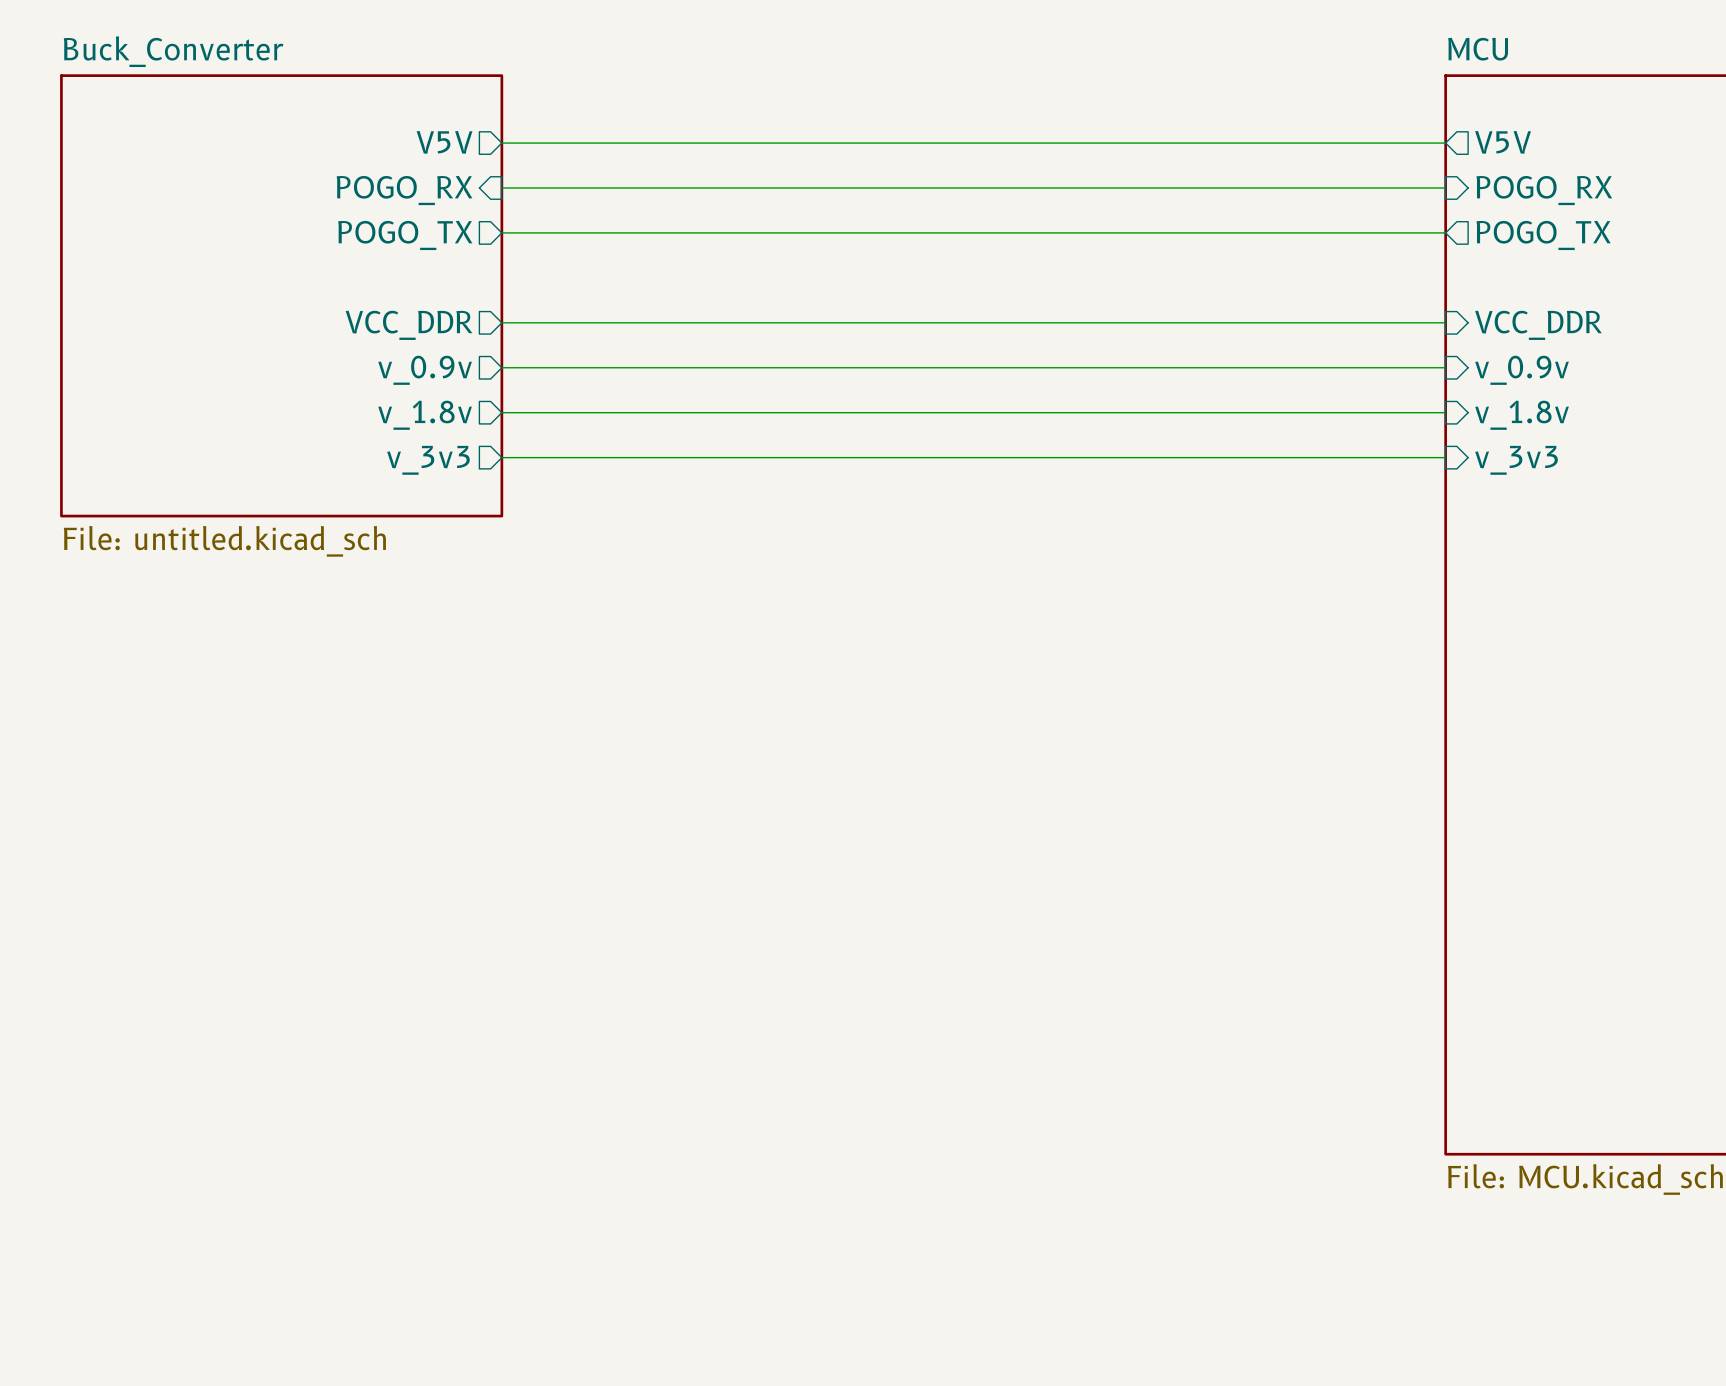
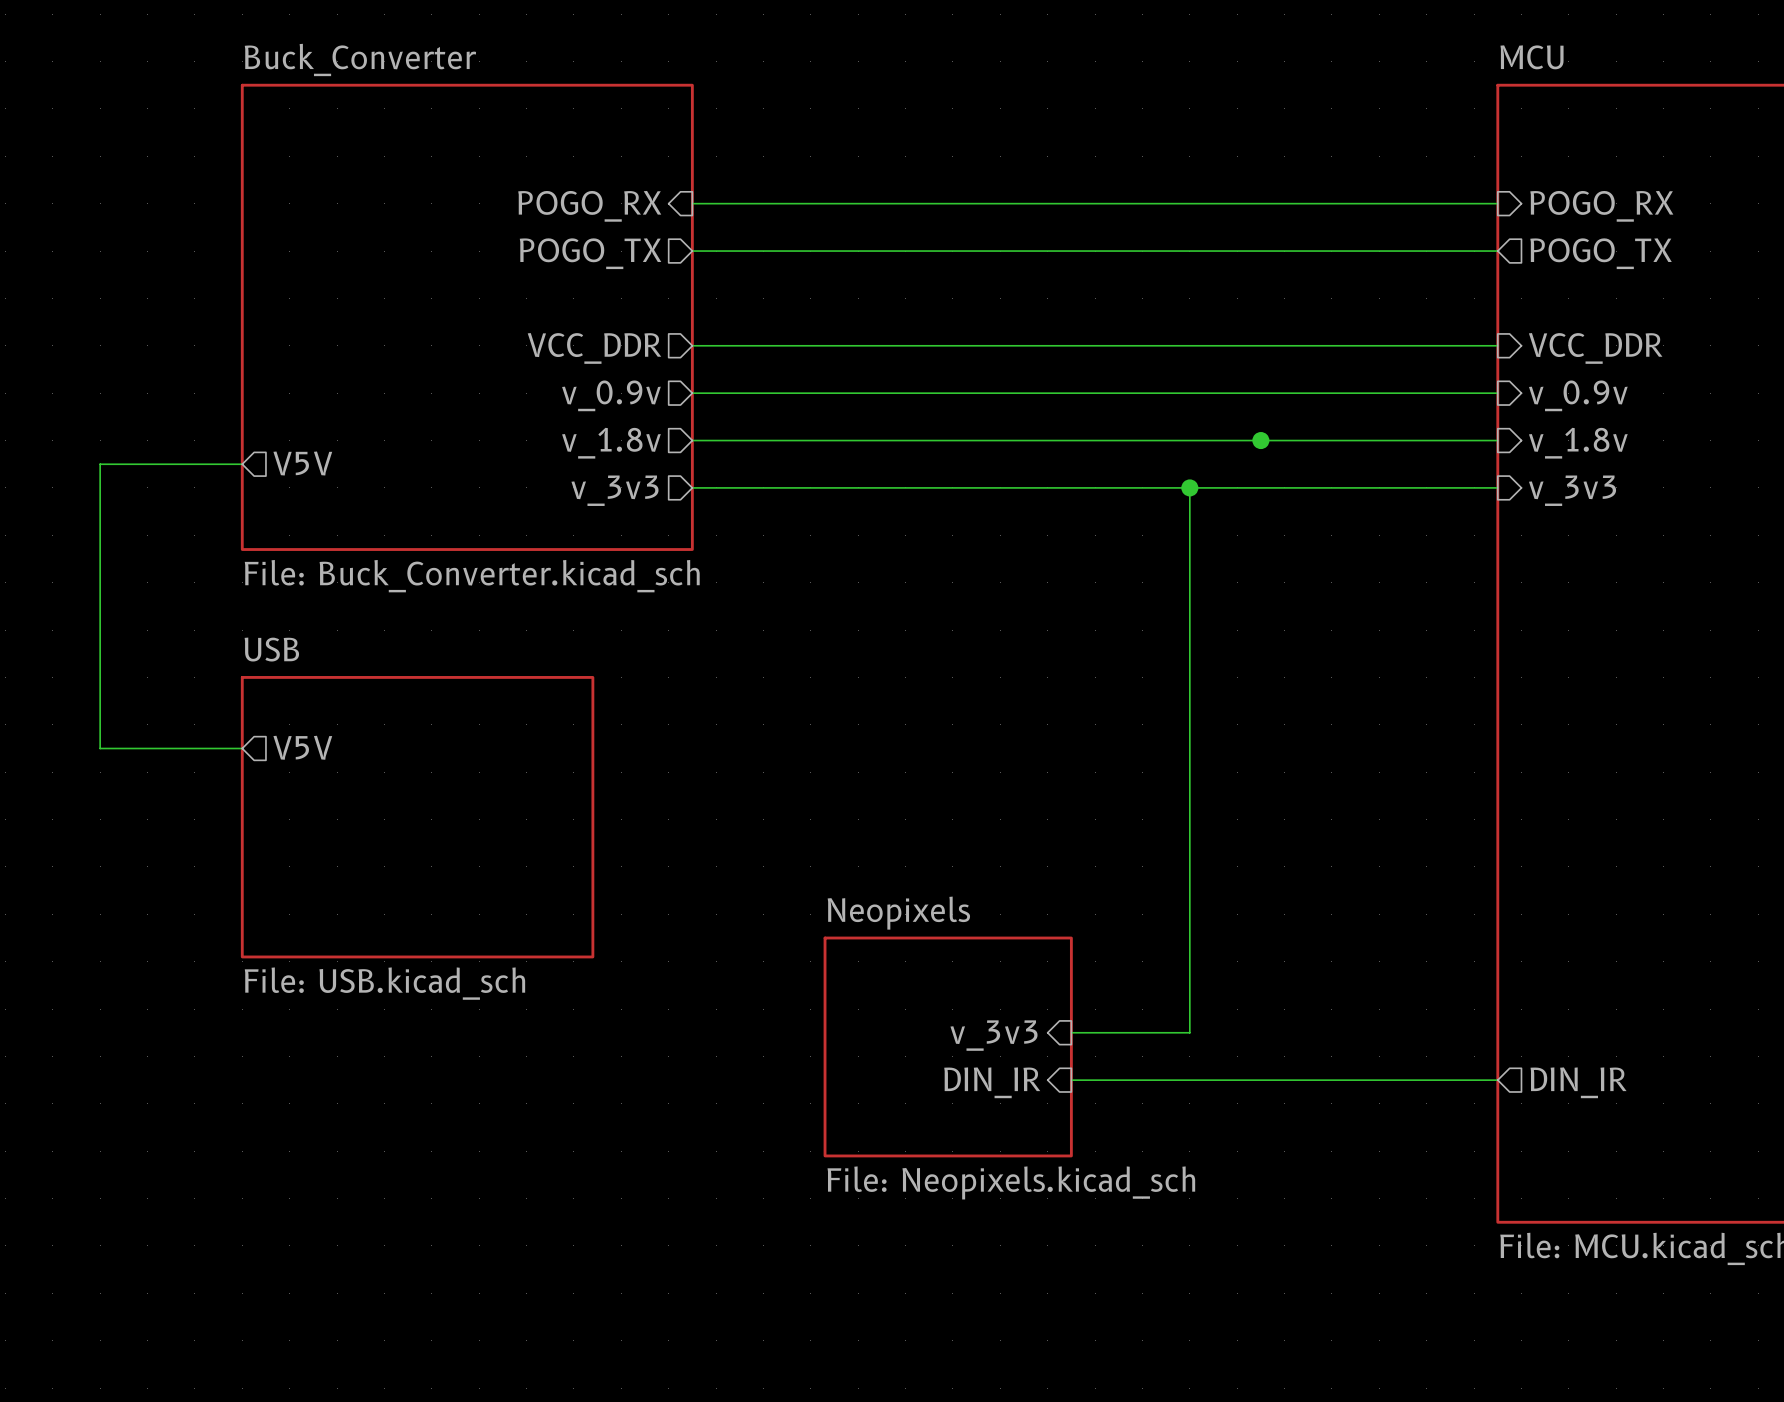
sheet pin: V5V (444, 142) -> none
sheet pin: V5V (1503, 142) -> none
wire: (501, 143) (1445, 143) -> none
wire: (501, 187) (681, 187) -> none
sheet pin position: POGO_RX (404, 190) -> POGO_RX (589, 206)
wire: (501, 232) (681, 232) -> none
sheet pin position: POGO_TX (405, 235) -> POGO_TX (590, 253)
sheet Buck_Converter: File: untitled.kicad_sch (281, 295) -> none
sheet Buck_Converter: none -> File: Buck_Converter.kicad_sch (467, 317)
wire: (501, 322) (681, 322) -> none
sheet pin position: VCC_DDR (409, 325) -> VCC_DDR (594, 348)
wire: (501, 367) (681, 367) -> none
sheet pin position: v_0.9v (425, 370) -> v_0.9v (611, 395)
wire: (501, 412) (681, 412) -> none
junction: none -> (1260, 440)
sheet pin position: v_1.8v (425, 415) -> v_1.8v (611, 443)
sheet pin: none -> V5V (302, 463)
wire: none -> (242, 464) (100, 464) (100, 748) (242, 748)
wire: (501, 457) (681, 457) -> none
wire: none -> (1189, 487) (1189, 1032) (1071, 1032)
junction: none -> (1189, 487)
sheet pin position: v_3v3 (428, 460) -> v_3v3 (614, 490)
sheet pin: none -> V5V (302, 747)
sheet USB: none -> File: USB.kicad_sch (417, 817)
sheet pin: none -> v_3v3 (994, 1035)
sheet Neopixels: none -> File: Neopixels.kicad_sch (948, 1046)
wire: none -> (1071, 1080) (1497, 1080)
sheet pin: none -> DIN_IR (992, 1082)
sheet pin: none -> DIN_IR (1578, 1082)

